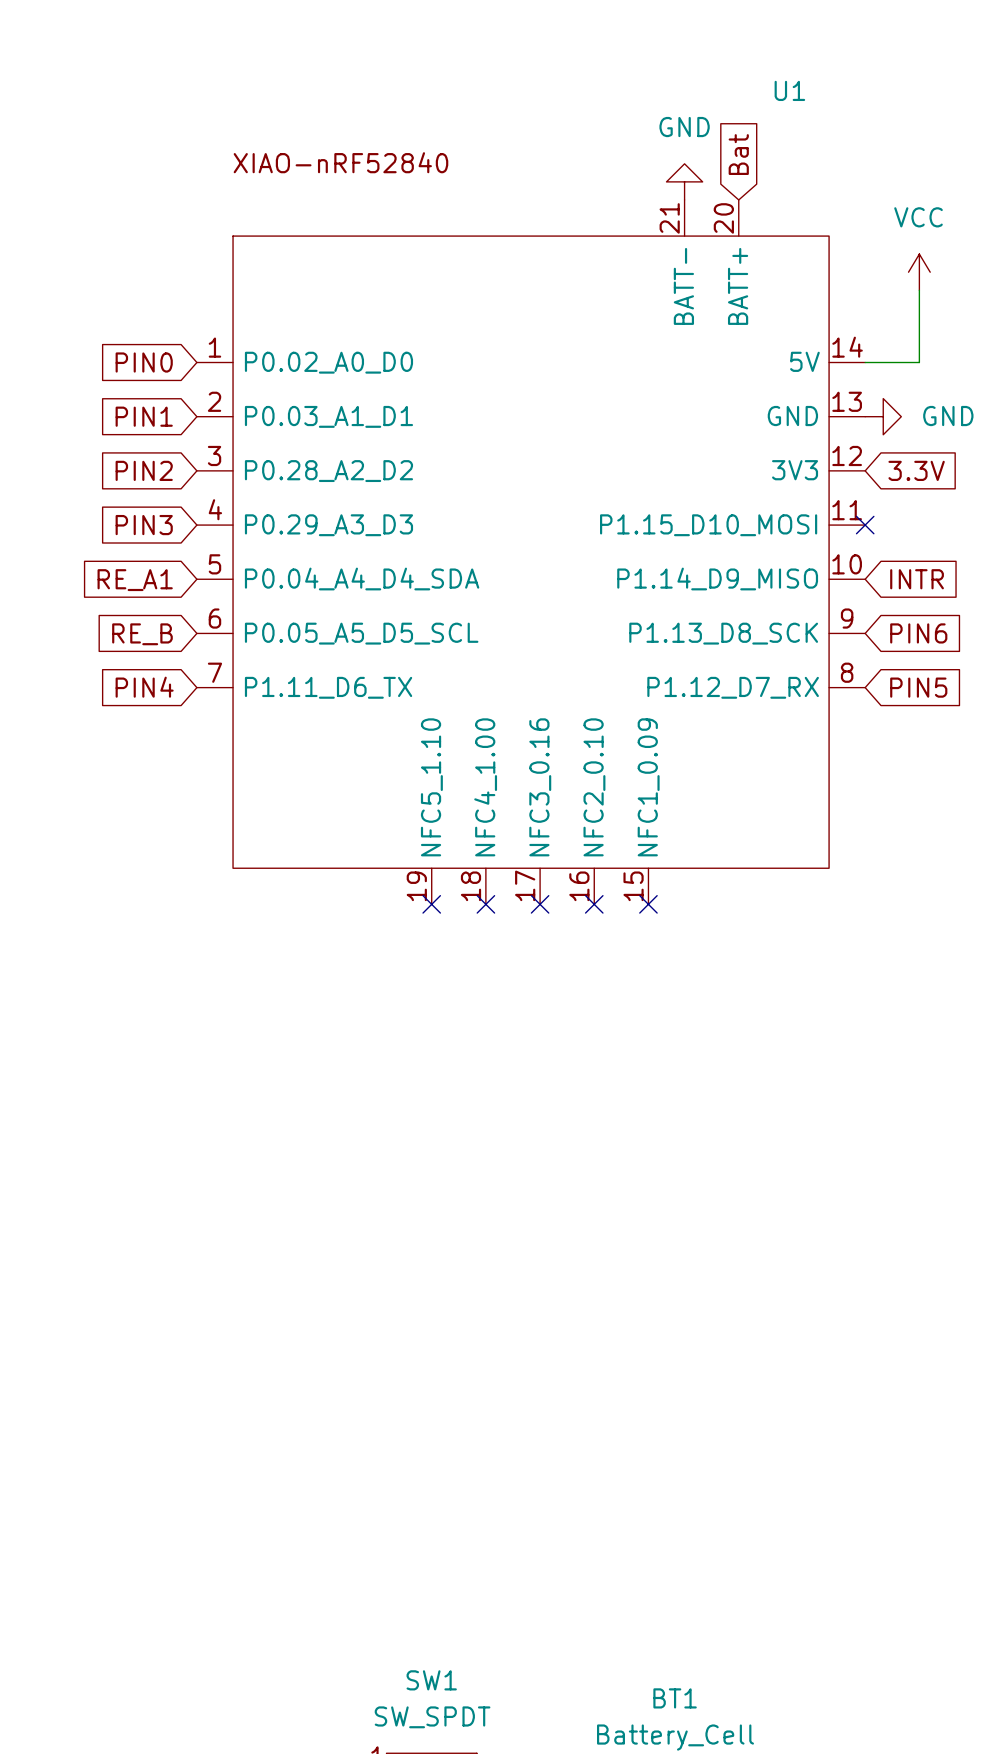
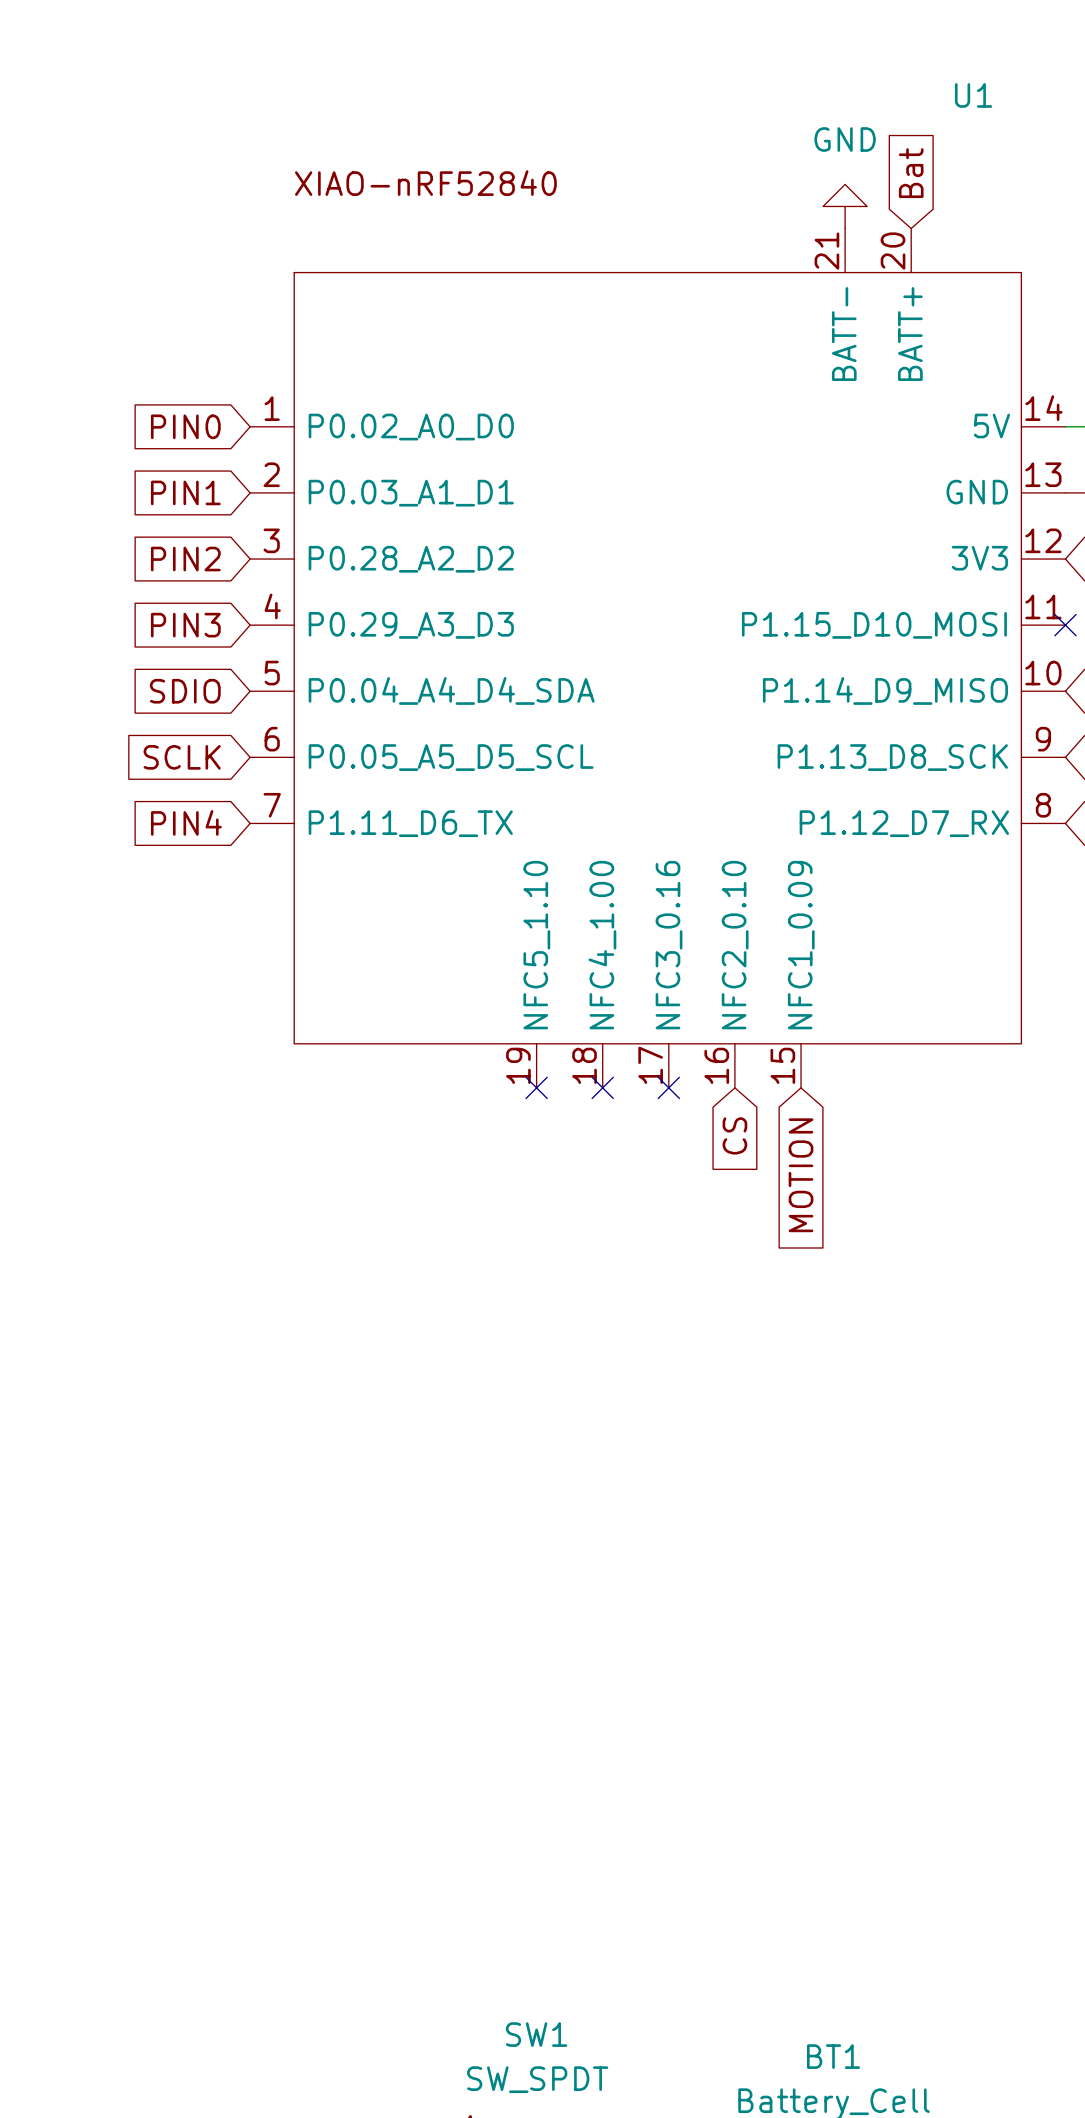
global label: RE_A1 (135, 580) -> SDIO (185, 691)
global label: RE_B (142, 634) -> SCLK (182, 757)
no-connect mark: (594, 904) -> none
no-connect mark: (648, 904) -> none
global label: none -> CS (734, 1135)
global label: none -> MOTION (801, 1175)

